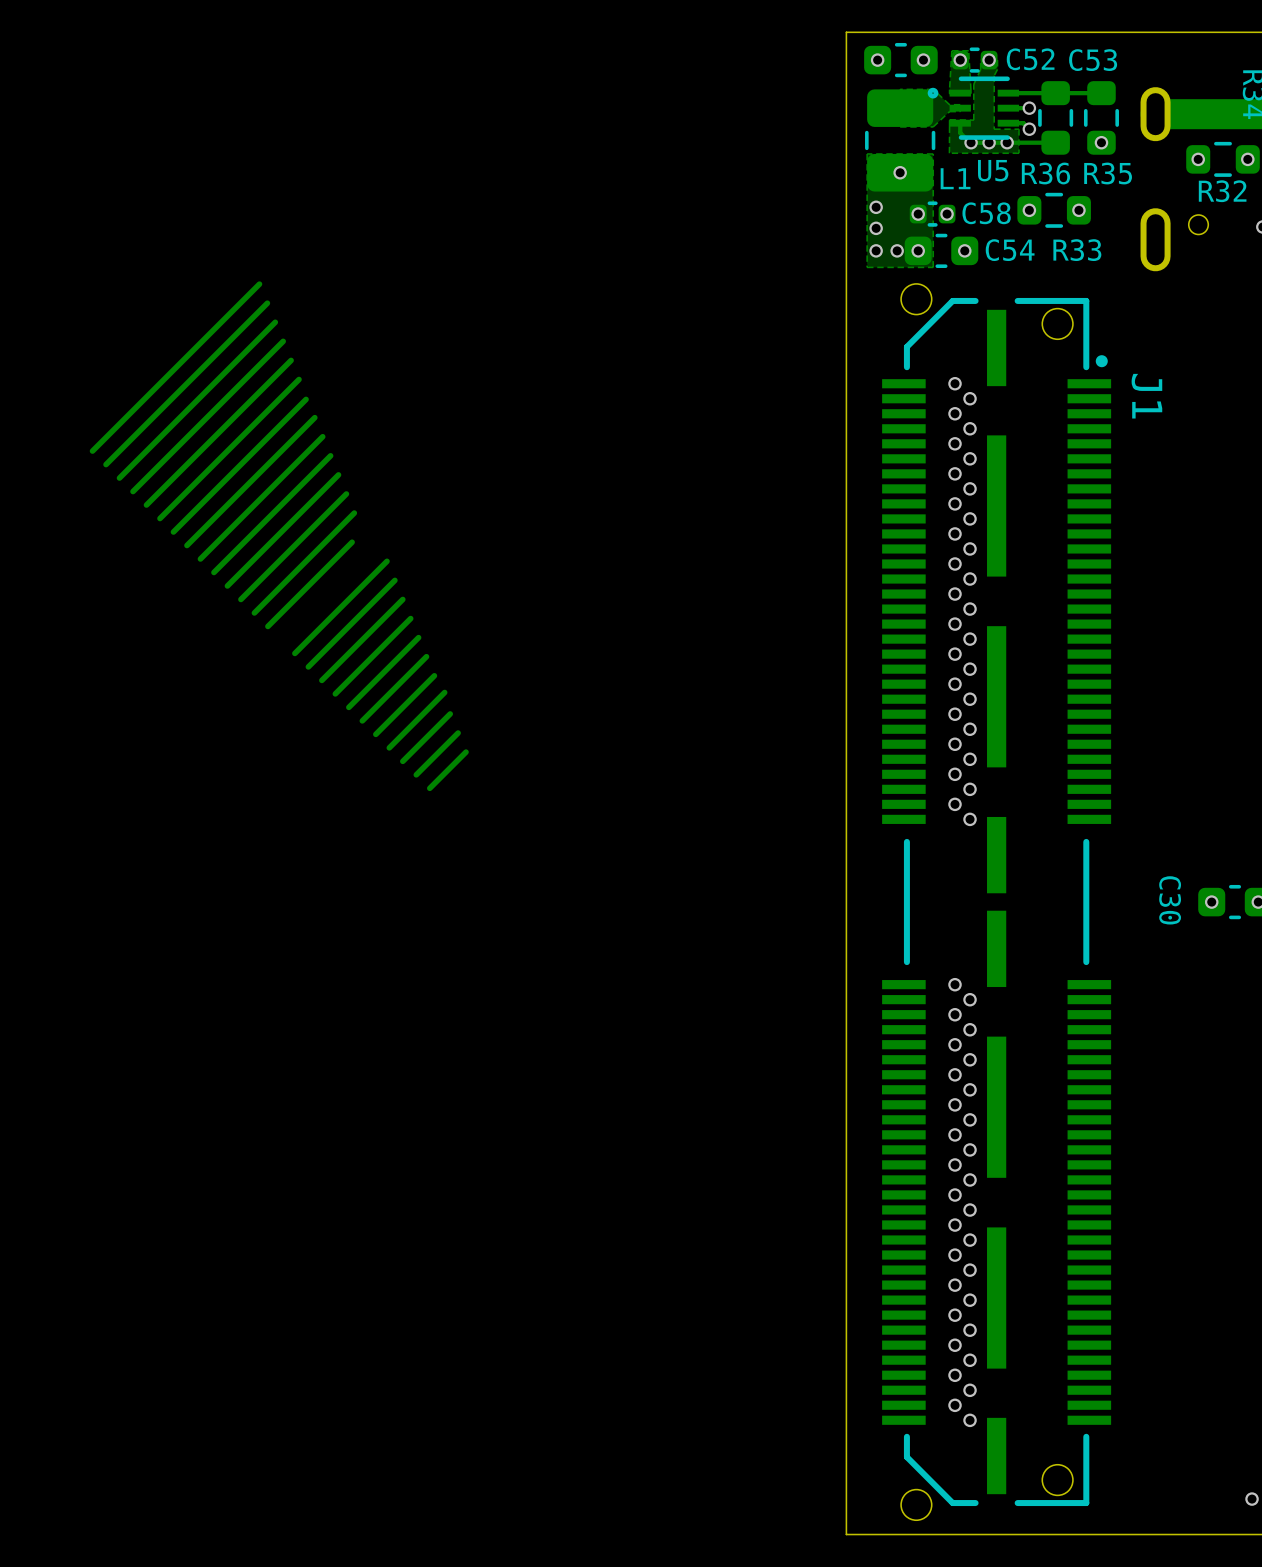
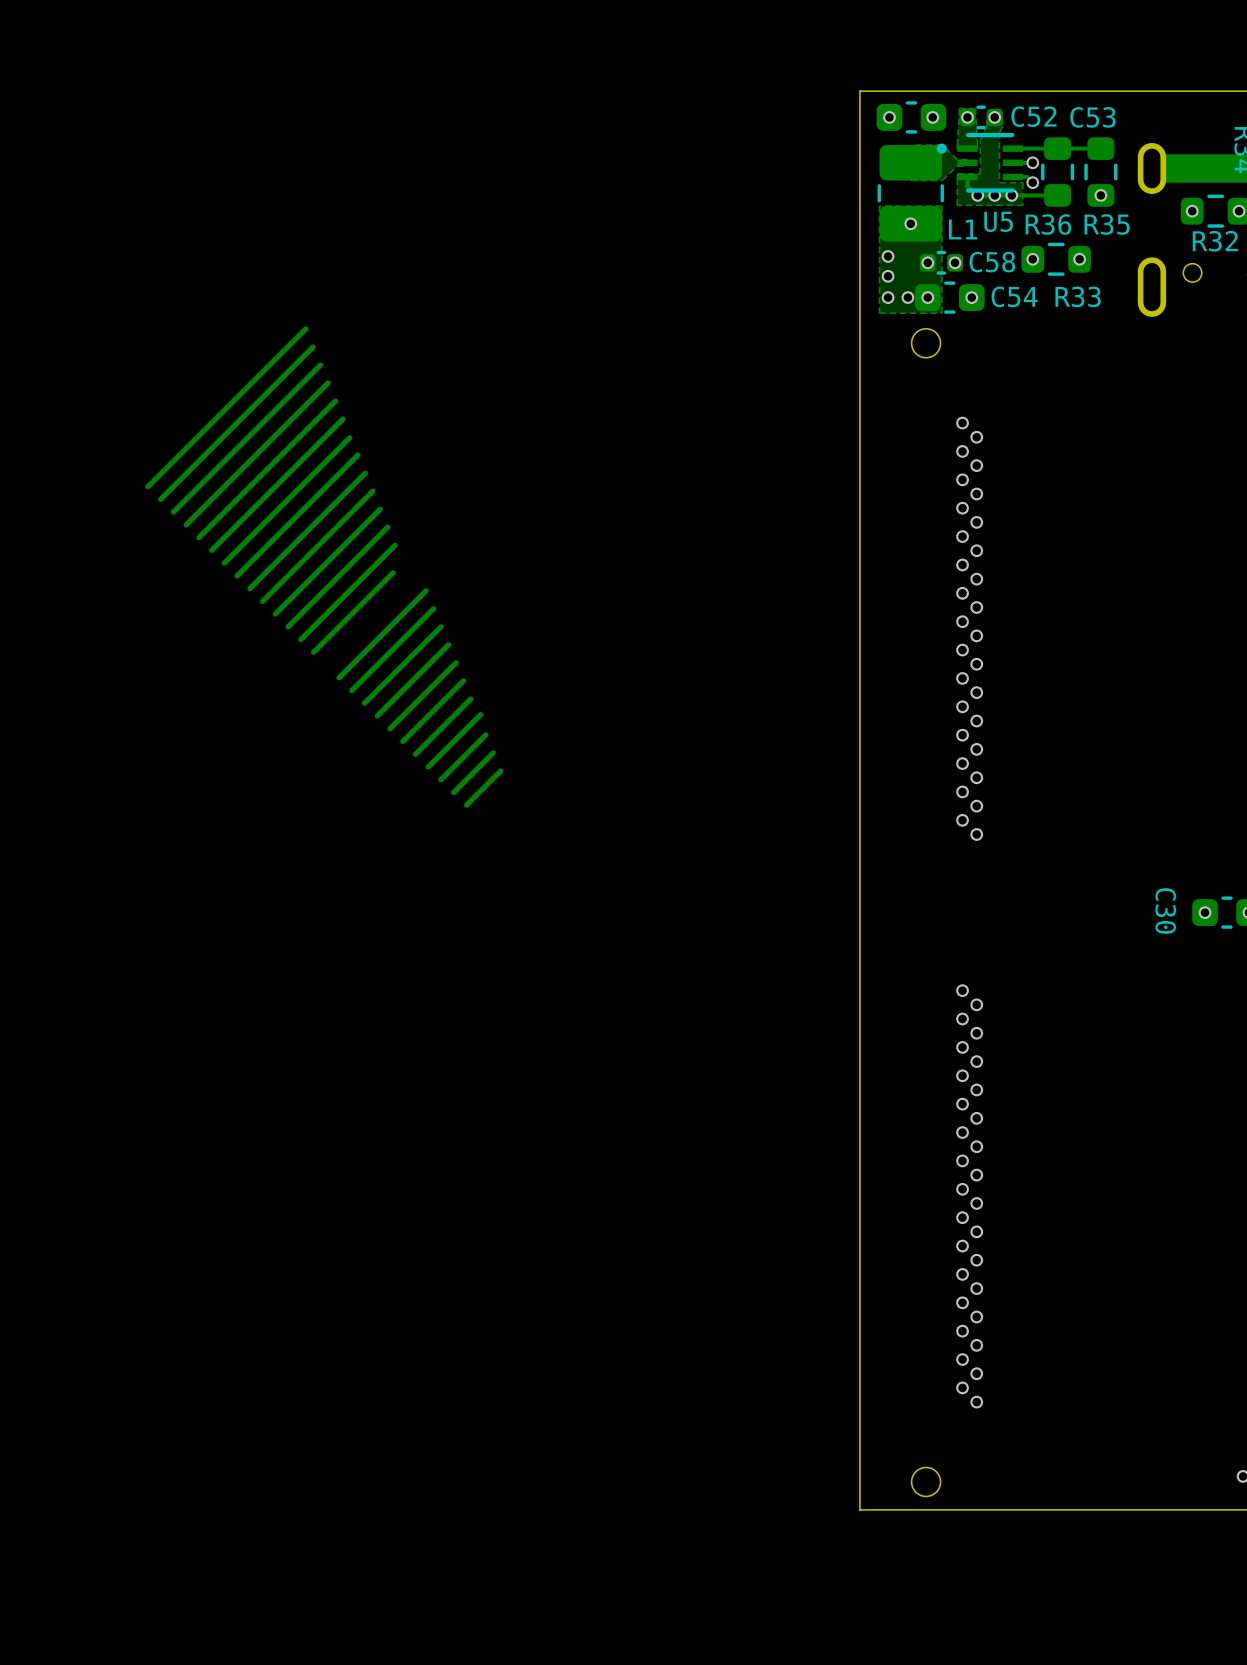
J1: (996, 901) -> none

